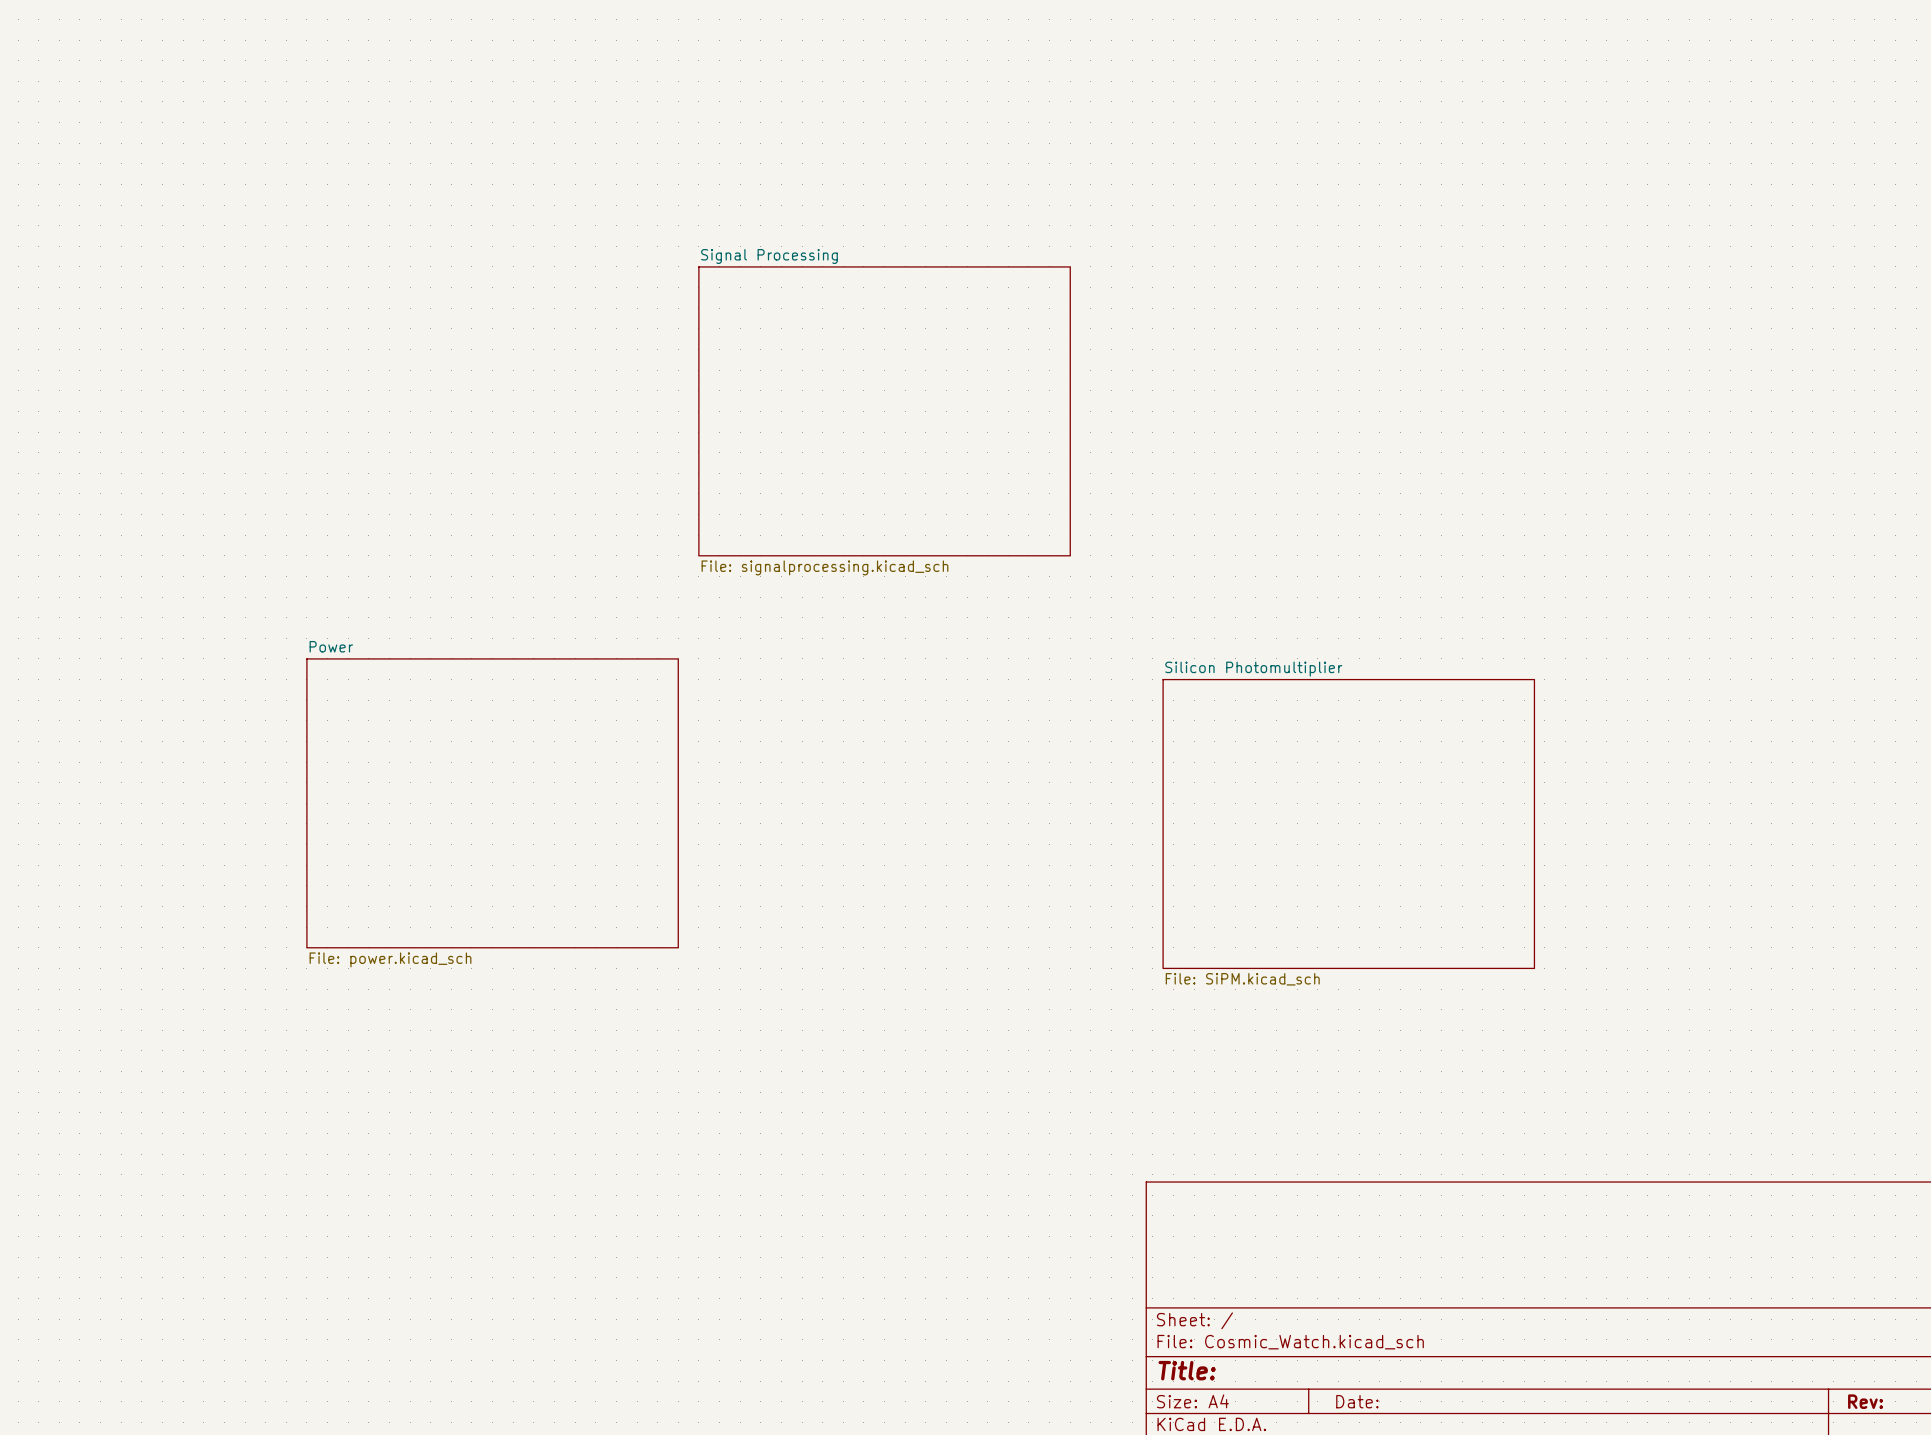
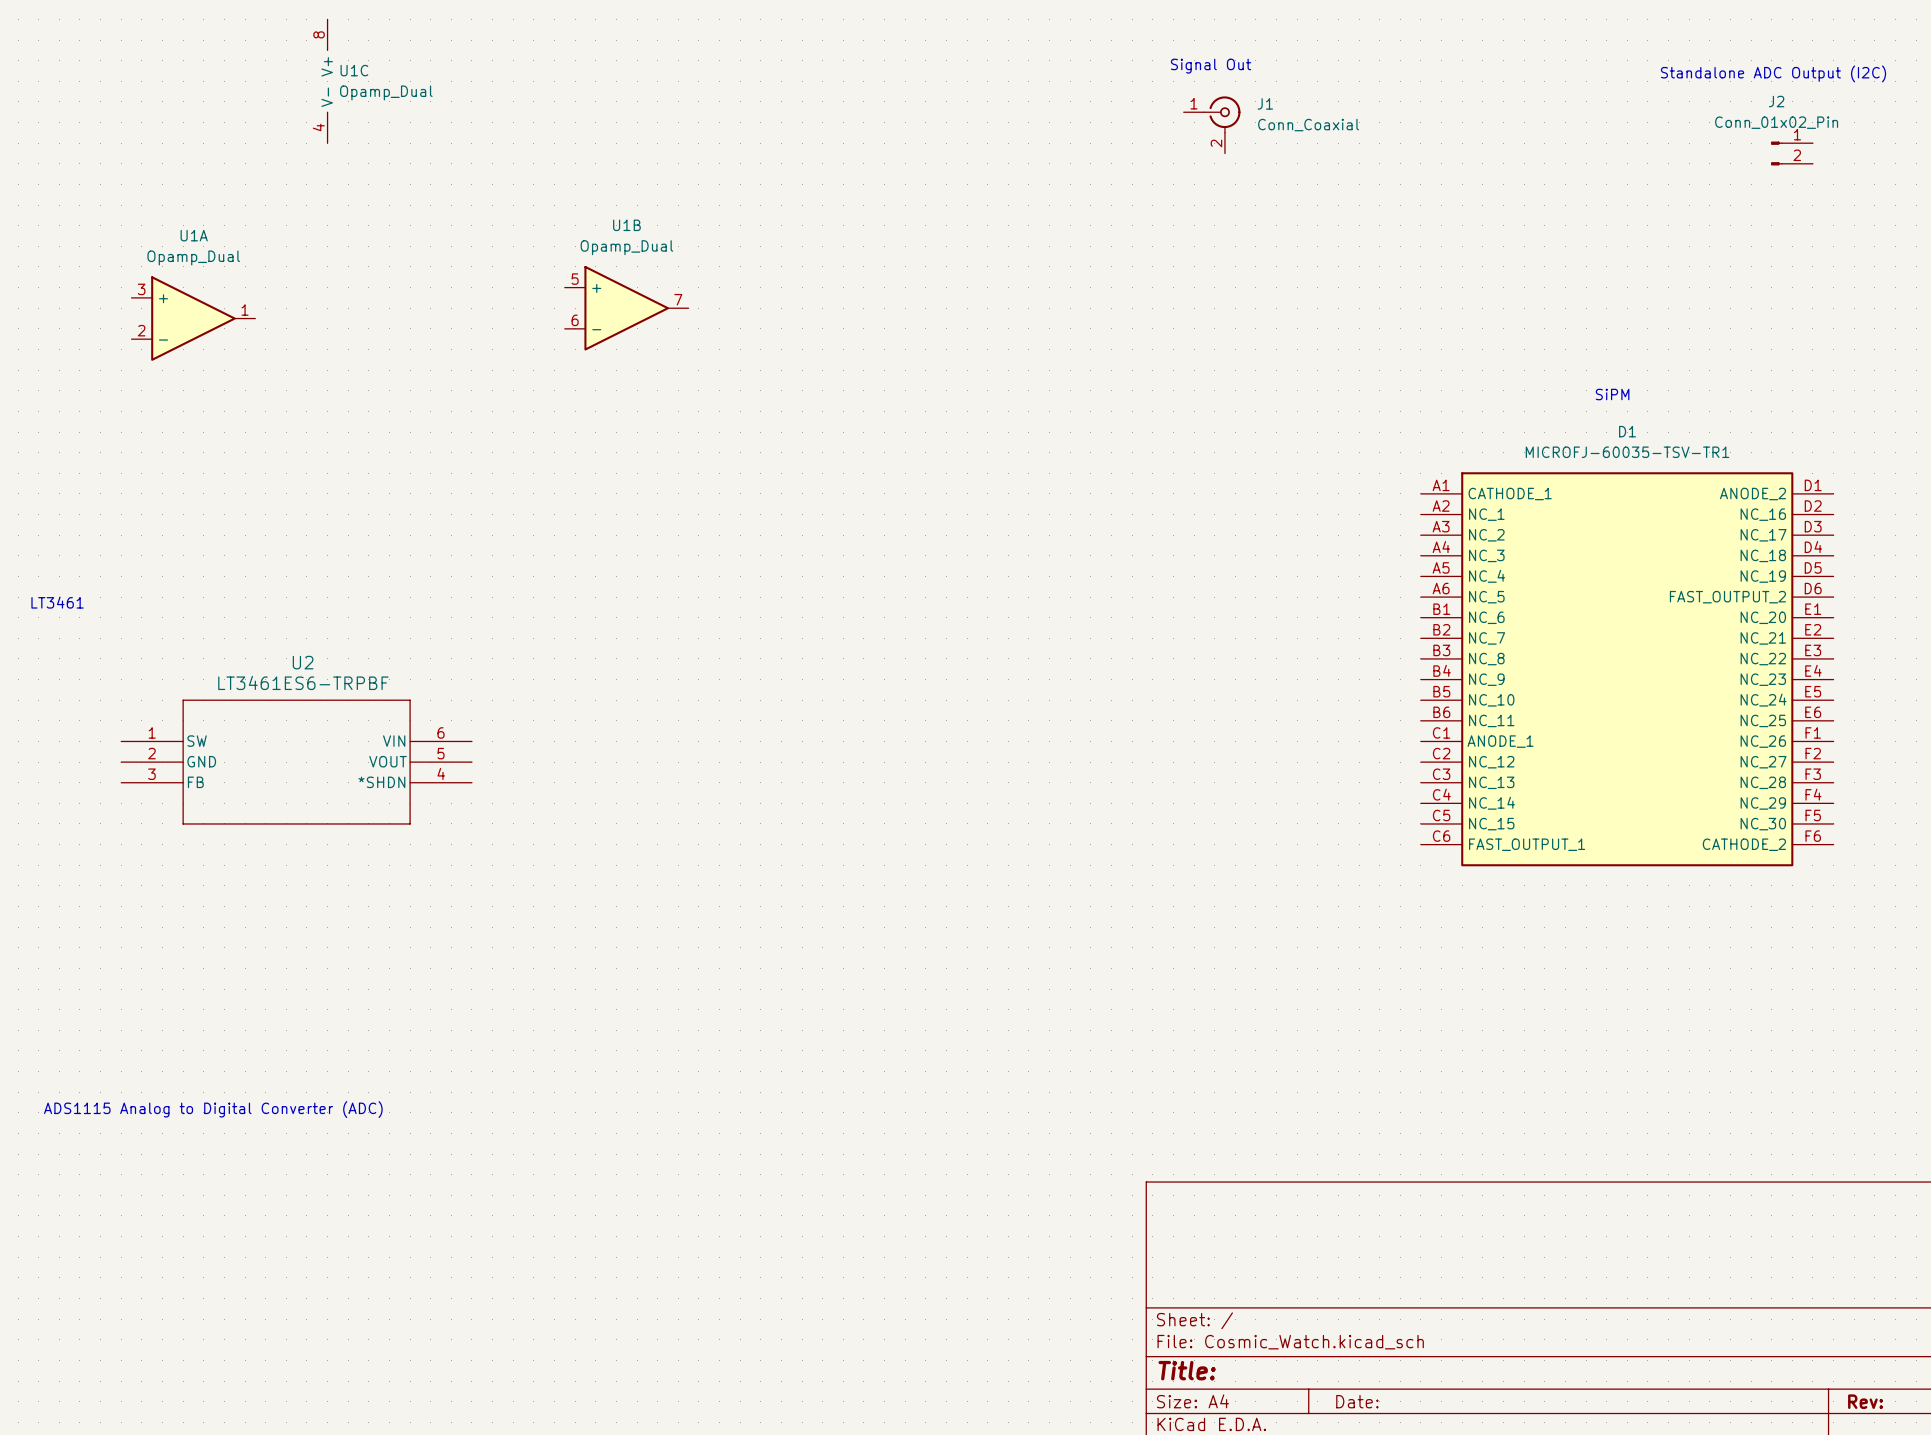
text: none -> Signal Out (1211, 66)
text: none -> Standalone ADC Output (I2C) (1773, 73)
U1C: none -> Opamp_Dual (327, 81)
J1: none -> Conn_Coaxial (1212, 124)
J2: none -> Conn_01x02_Pin (1792, 153)
U1B: none -> Opamp_Dual (626, 308)
U1A: none -> Opamp_Dual (193, 318)
text: none -> SiPM (1612, 394)
sheet Signal Processing: File: signalprocessing.kicad_sch (884, 411) -> none
text: none -> LT3461 (57, 602)
D1: none -> MICROFJ-60035-TSV-TR1 (1627, 669)
U2: none -> LT3461ES6-TRPBF (296, 762)
sheet Power: File: power.kicad_sch (492, 803) -> none
sheet Silicon Photomultiplier: File: SiPM.kicad_sch (1348, 823) -> none
text: none -> ADS1115 Analog to Digital Converter (ADC) (213, 1109)

